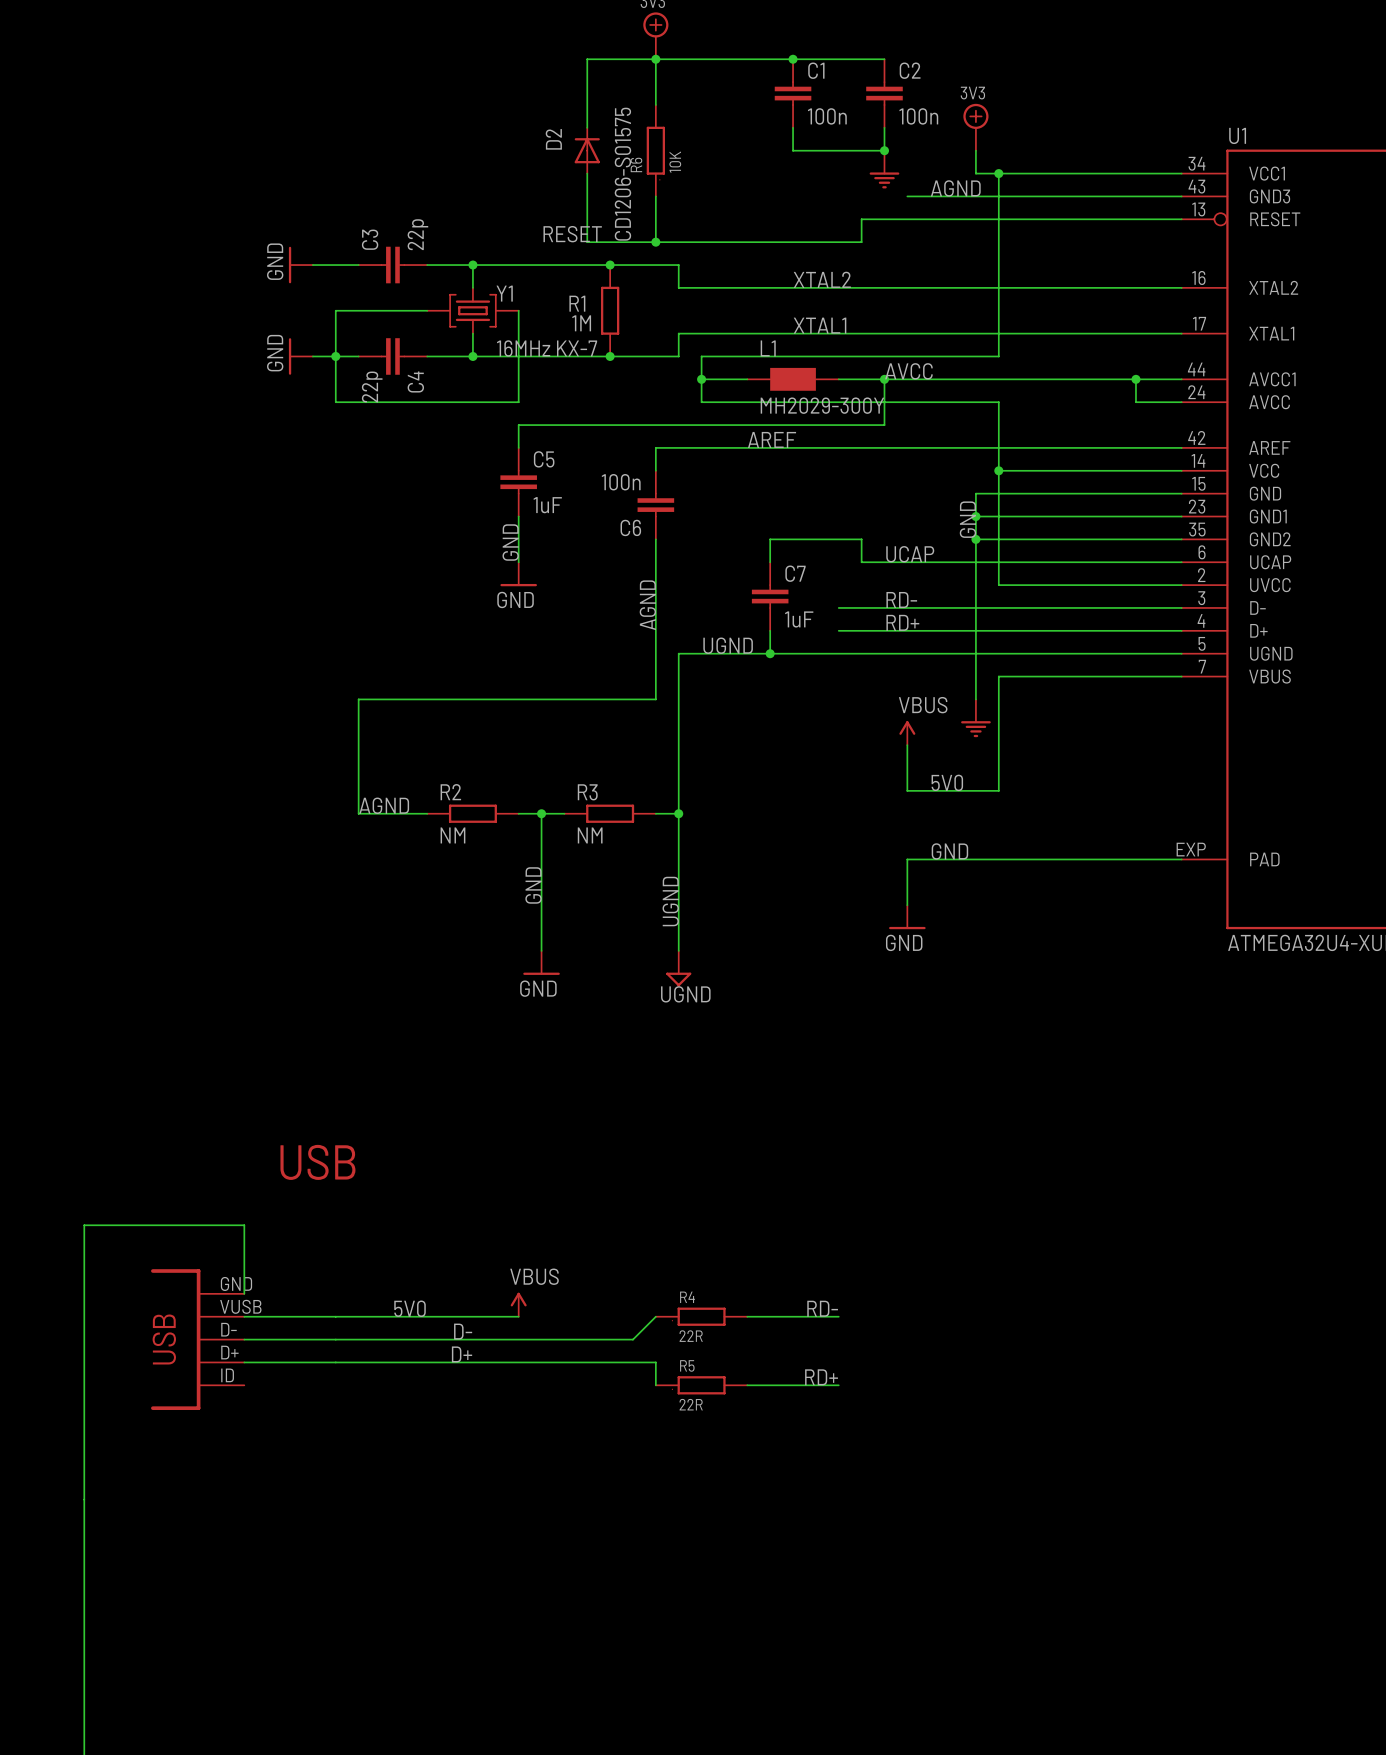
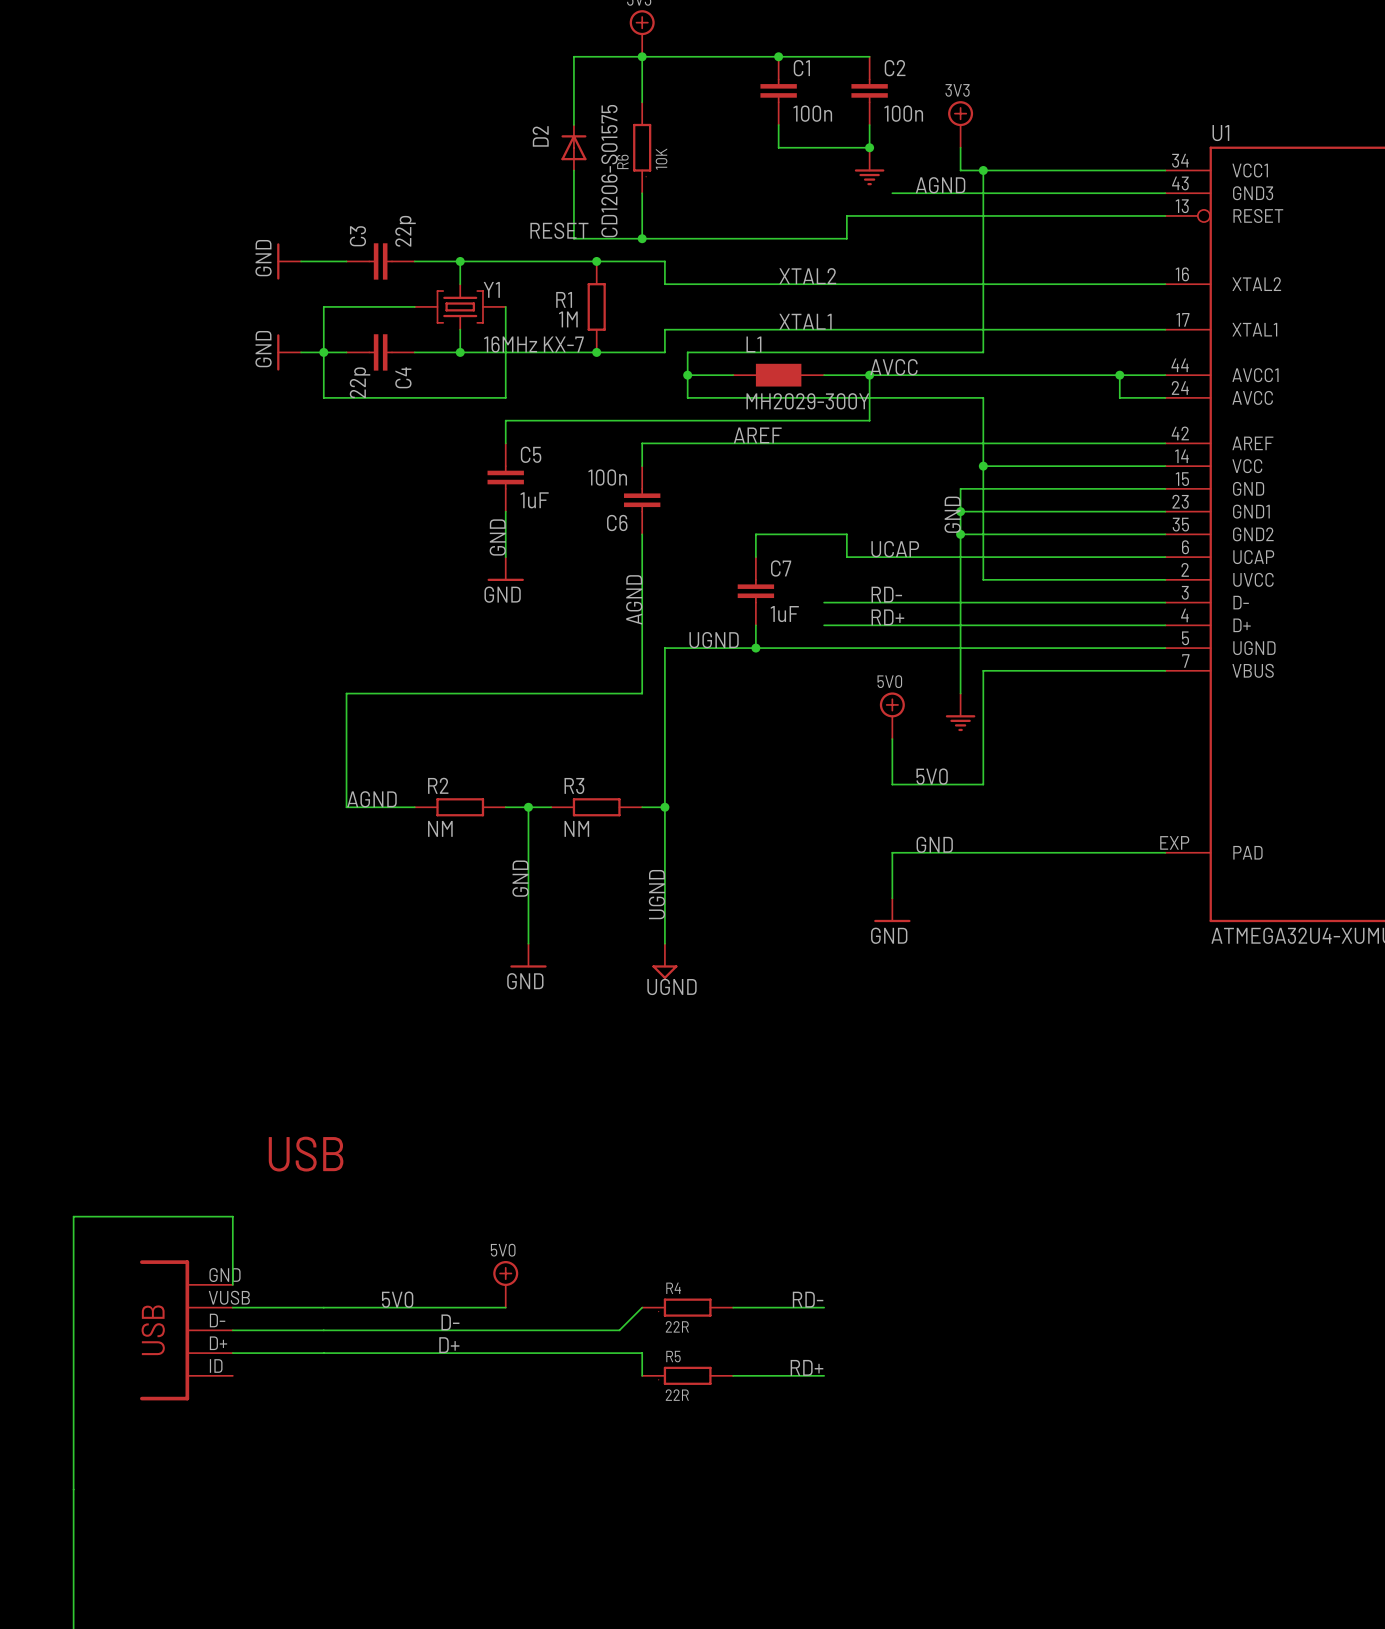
power symbol: none -> 5V0 (892, 715)
power symbol: VBUS (907, 733) -> none
power symbol: none -> 5V0 (505, 1284)
power symbol: VBUS (518, 1304) -> none

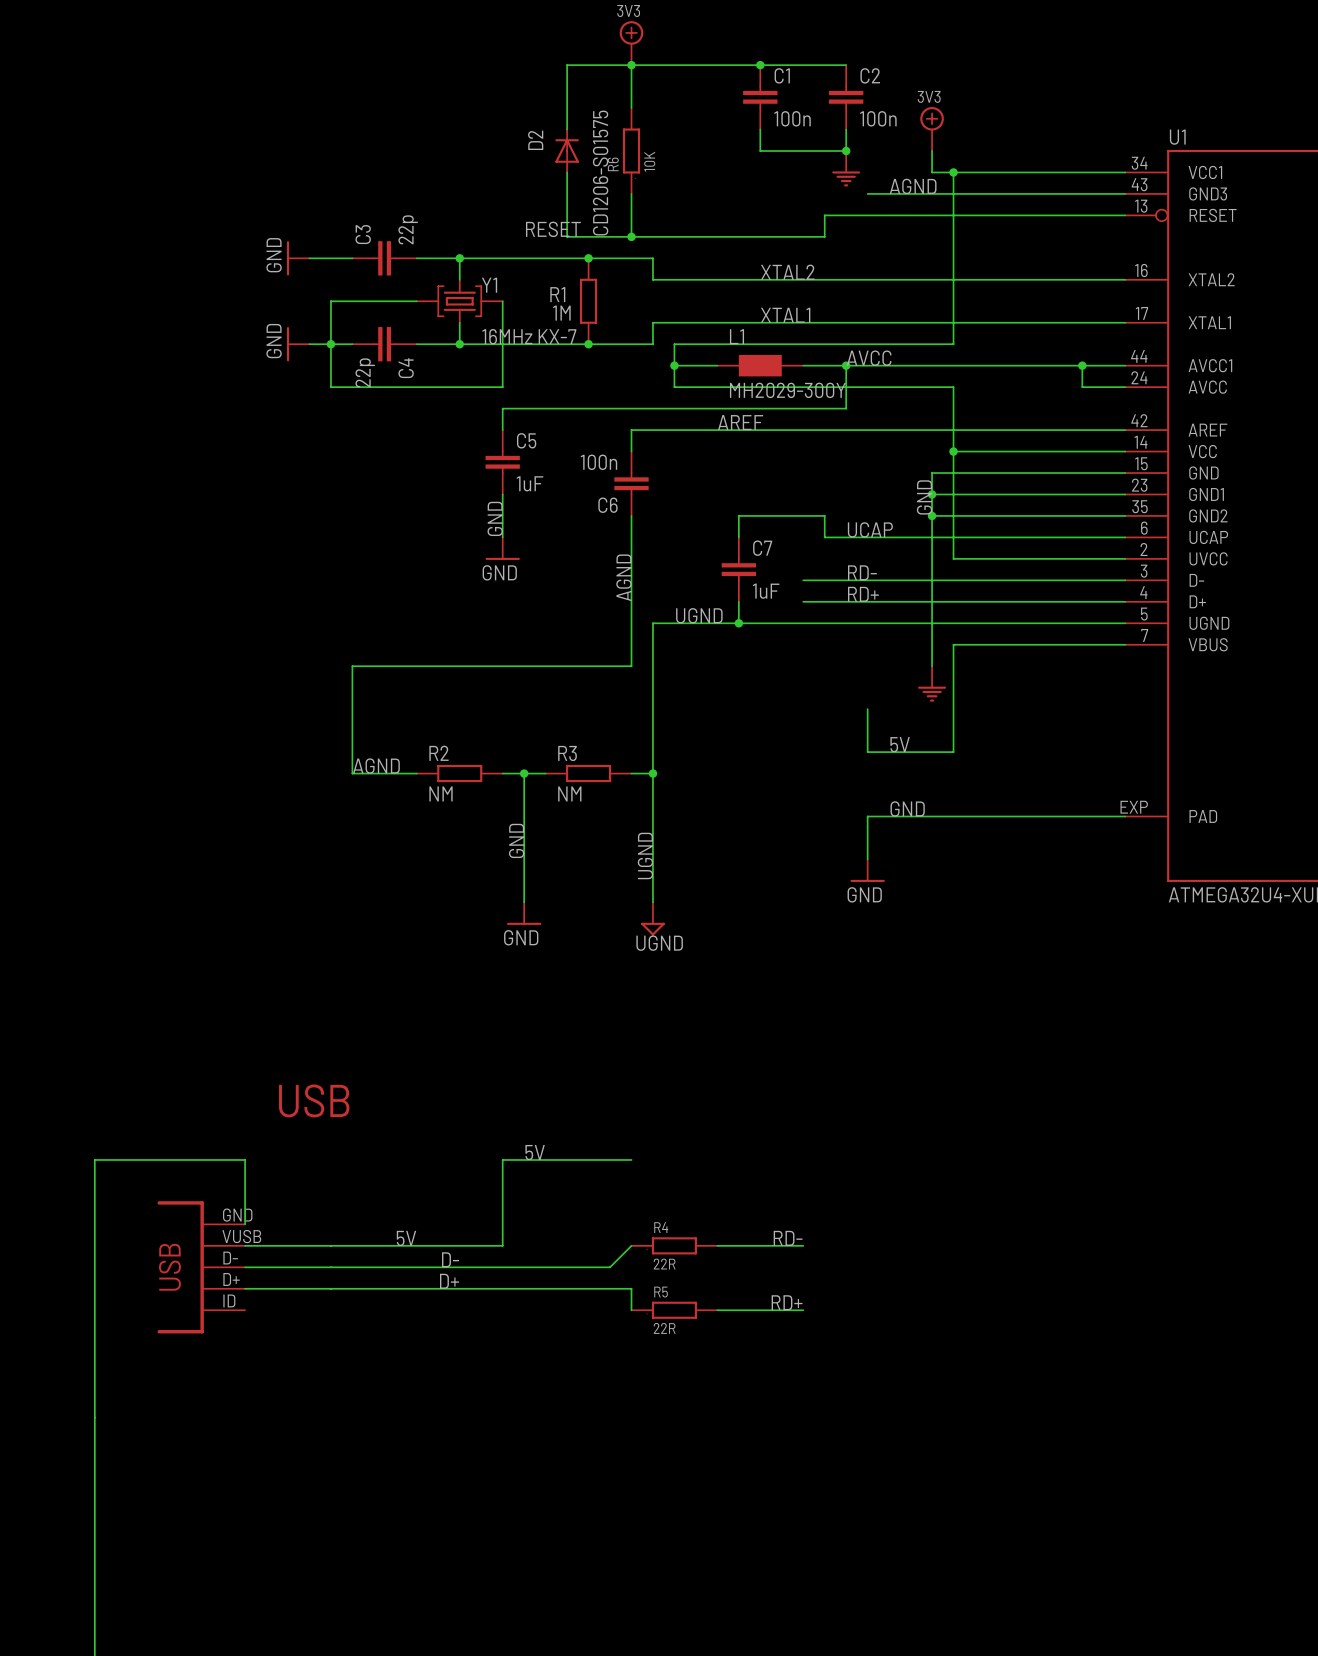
power symbol: 5V0 (892, 715) -> none
label: 5V0 (932, 776) -> 5V (900, 744)
label: none -> 5V (535, 1152)
wire: none -> (631, 1159) (502, 1159) (502, 1245)
power symbol: 5V0 (505, 1284) -> none
label: 5V0 (397, 1299) -> 5V (406, 1238)

